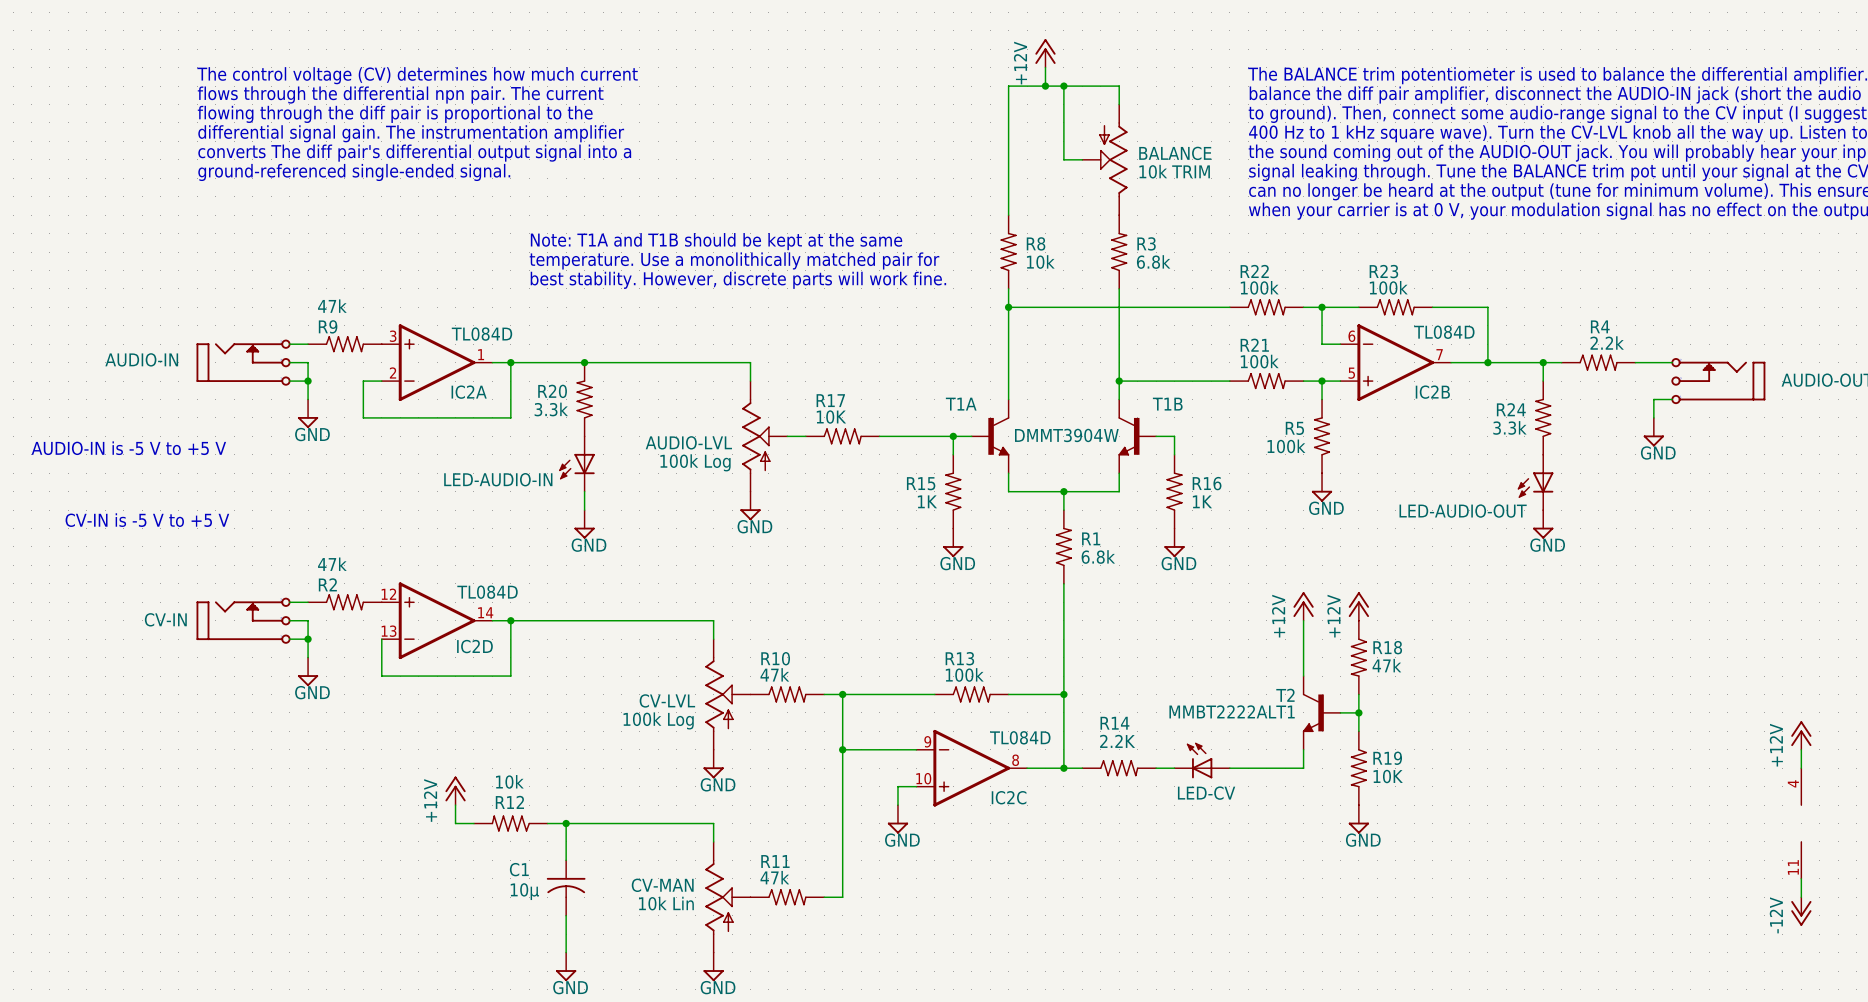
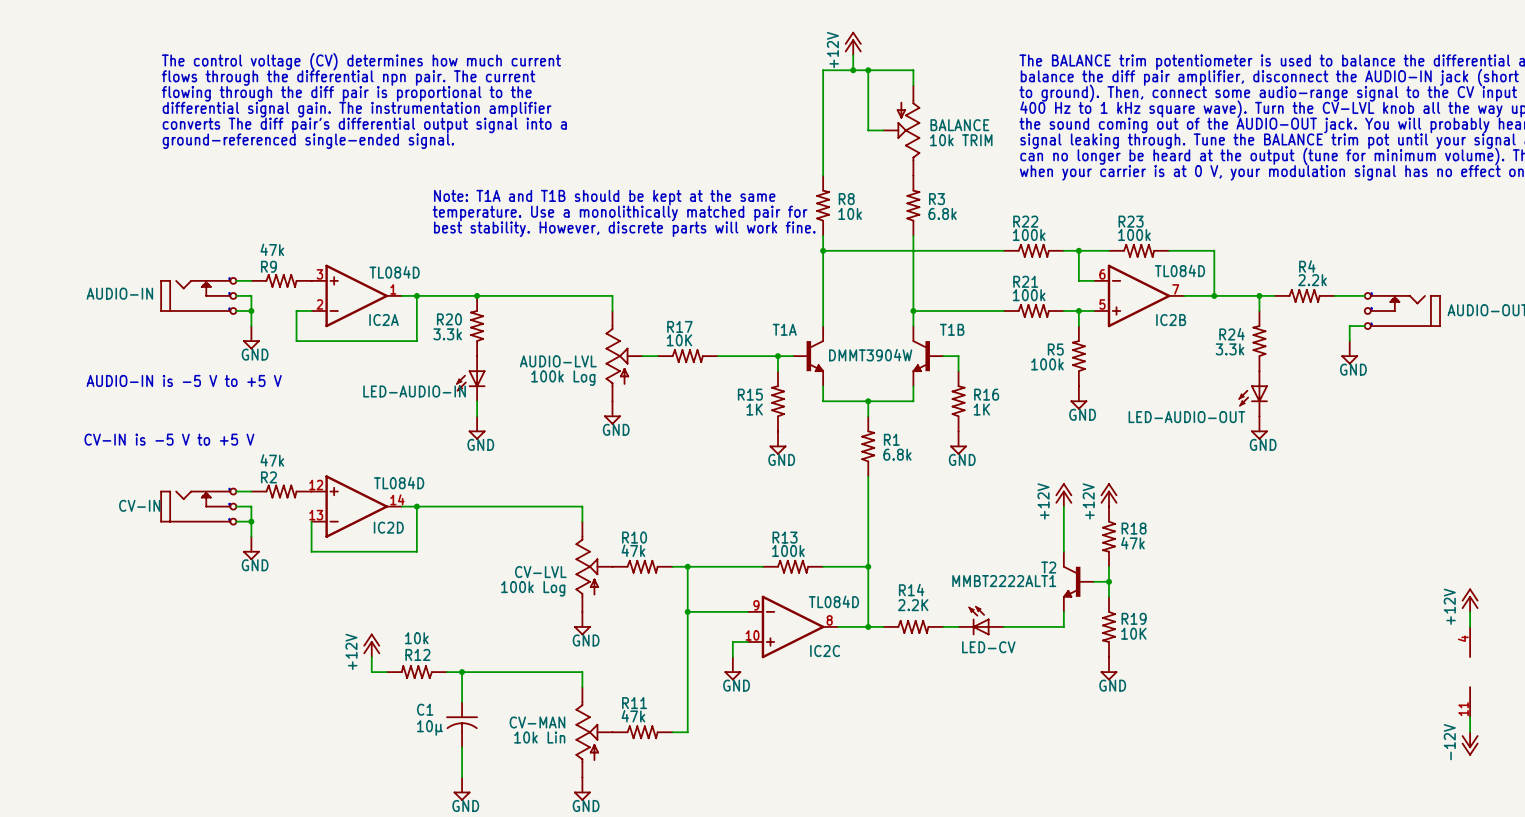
text position: AUDIO-IN is -5 V to +5 V (128, 448) -> AUDIO-IN is -5 V to +5 V (184, 380)
text position: CV-IN is -5 V to +5 V (147, 520) -> CV-IN is -5 V to +5 V (169, 439)

